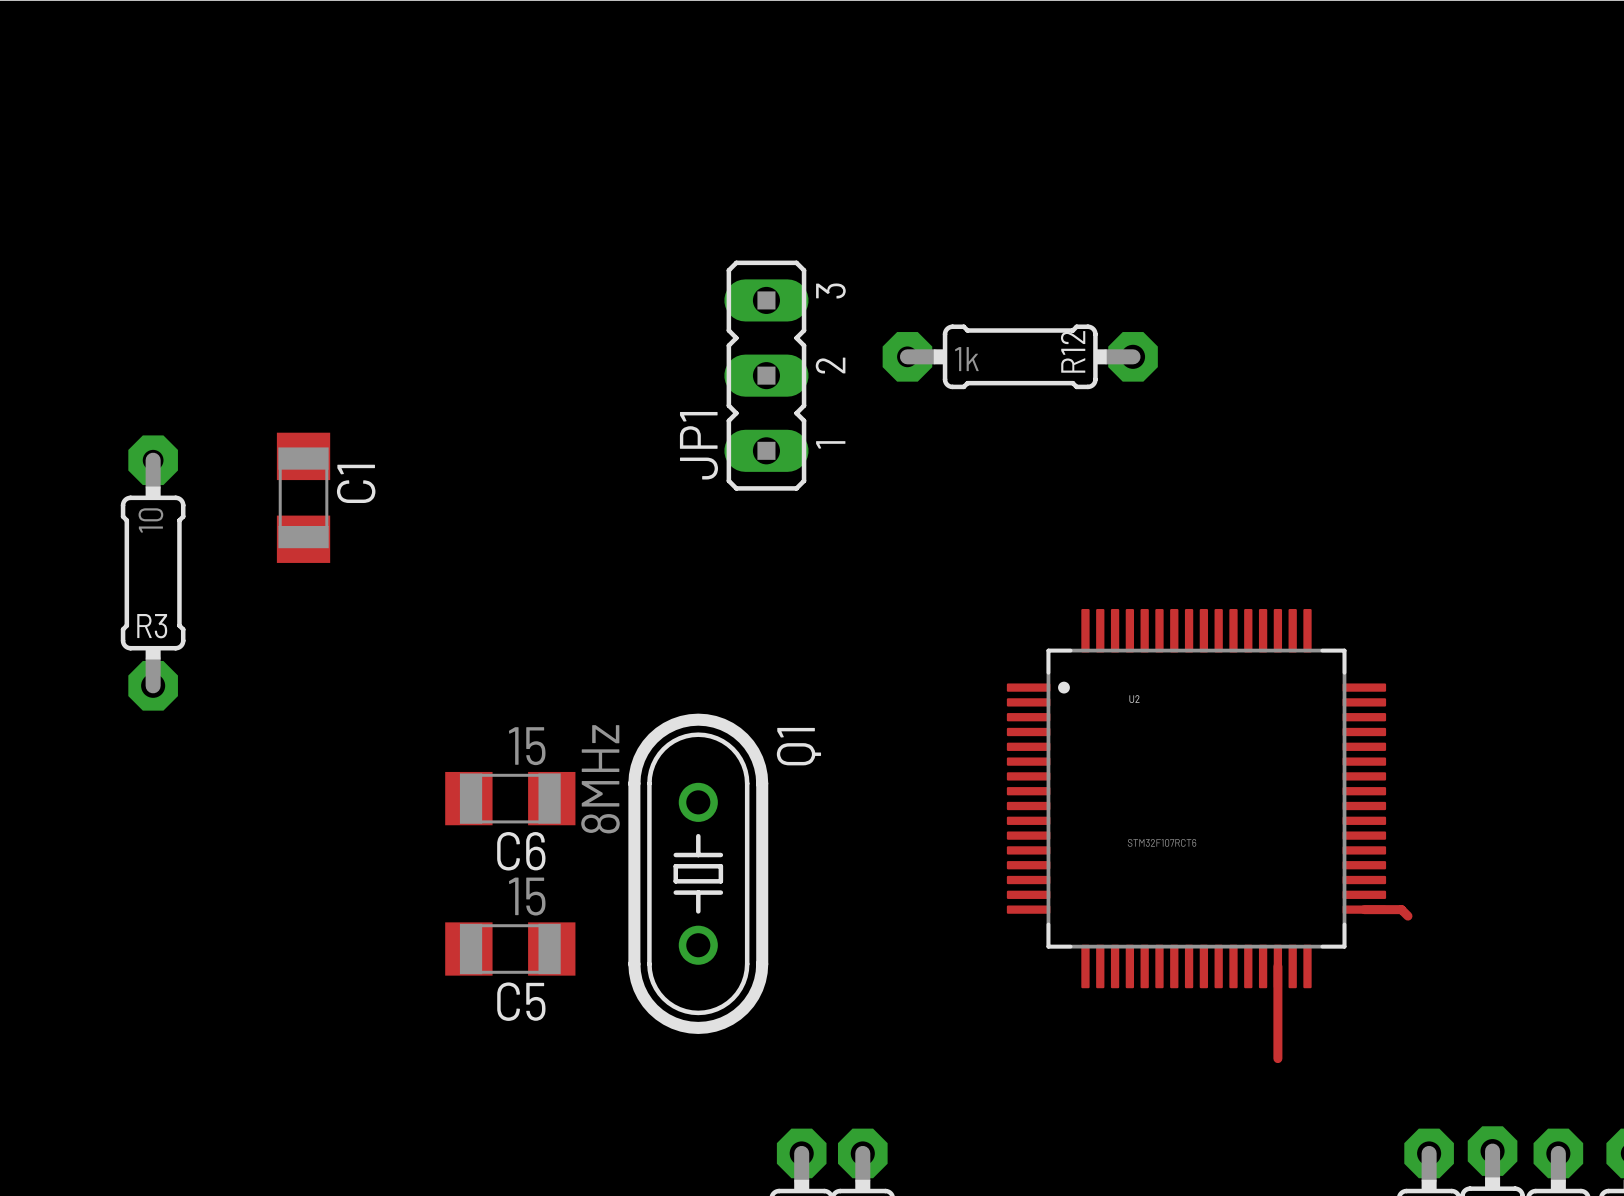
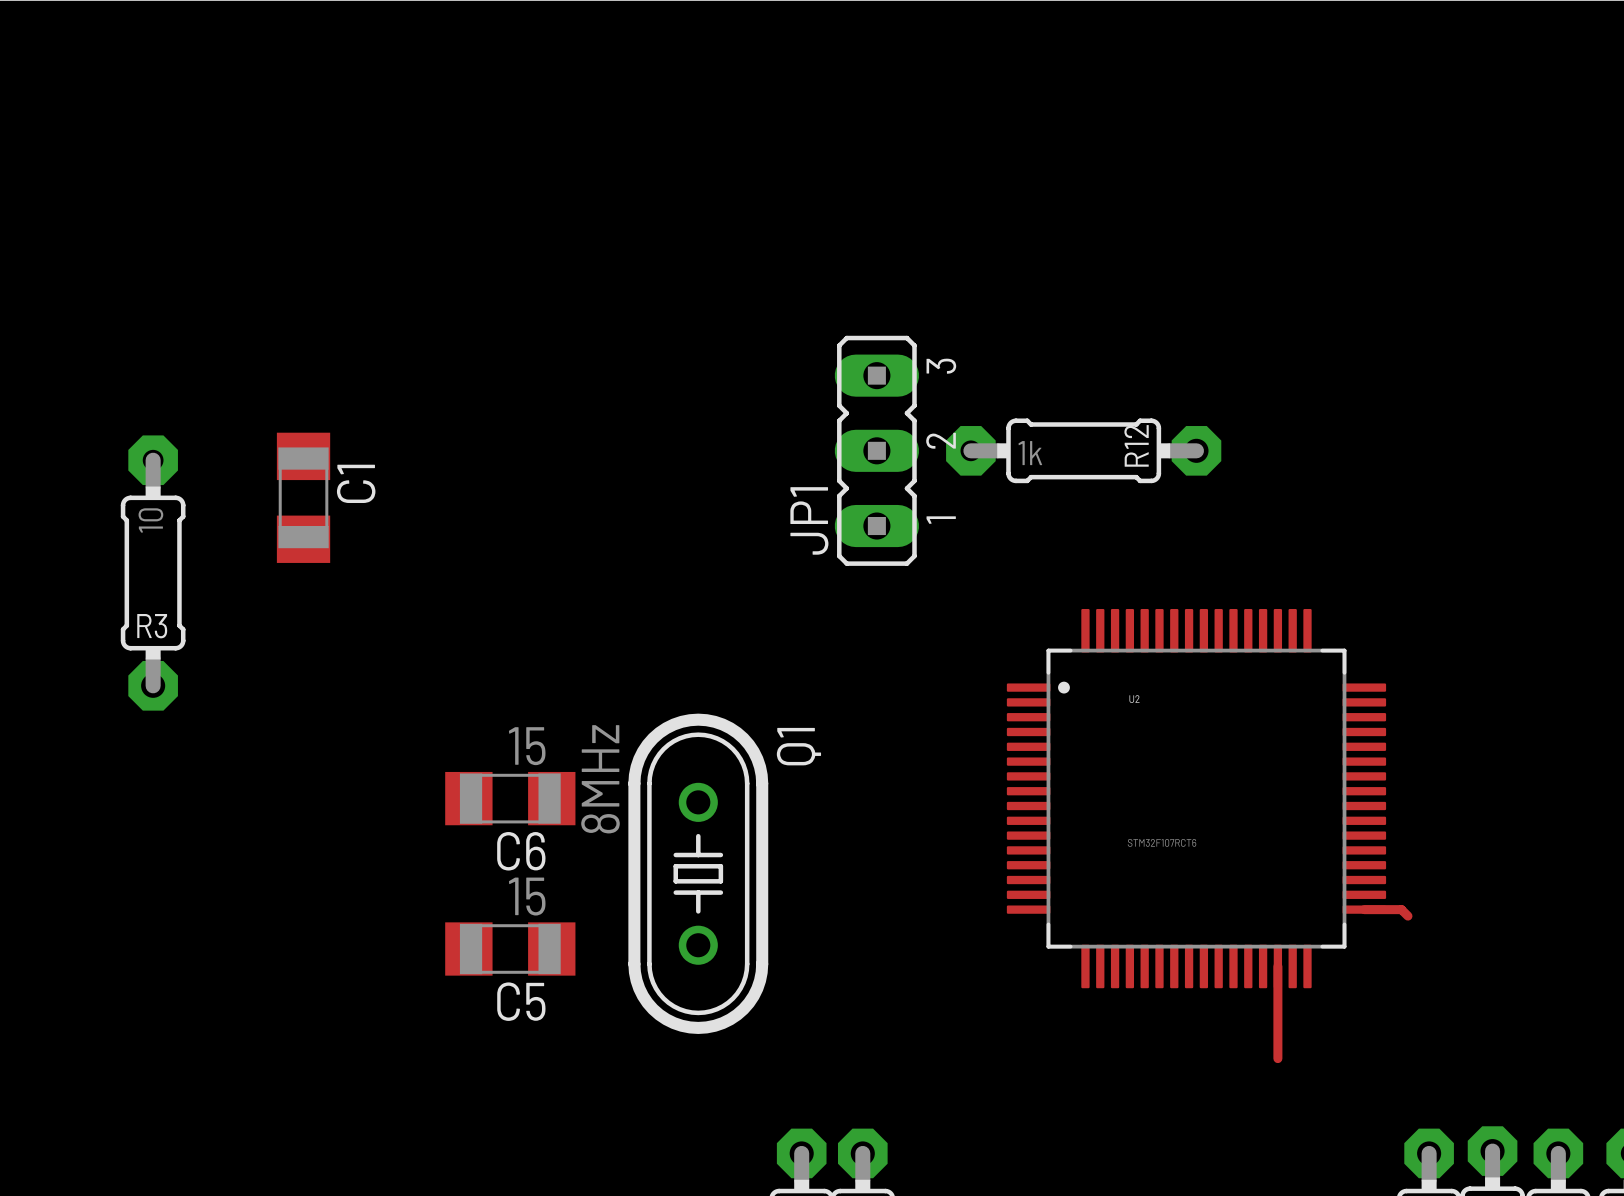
R12 position: (1020, 356) -> (1083, 450)
JP1 position: (766, 375) -> (876, 450)

